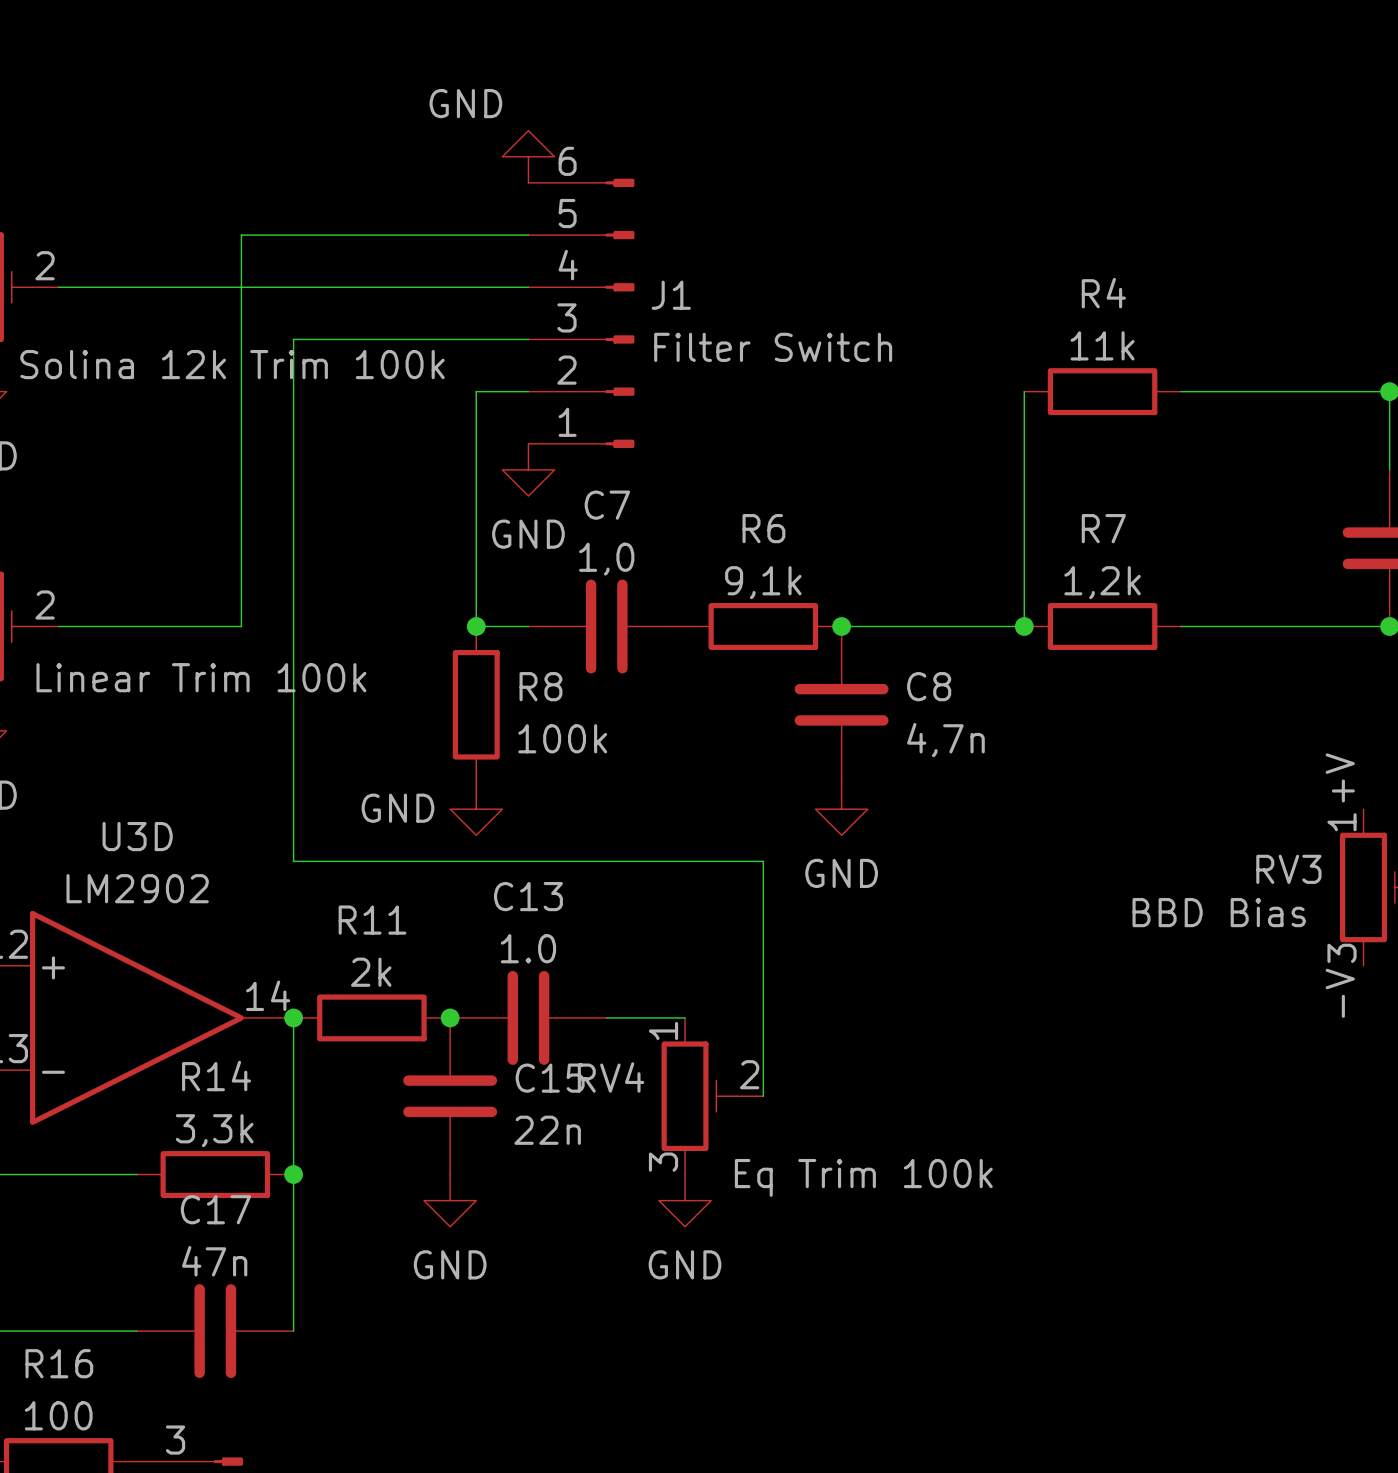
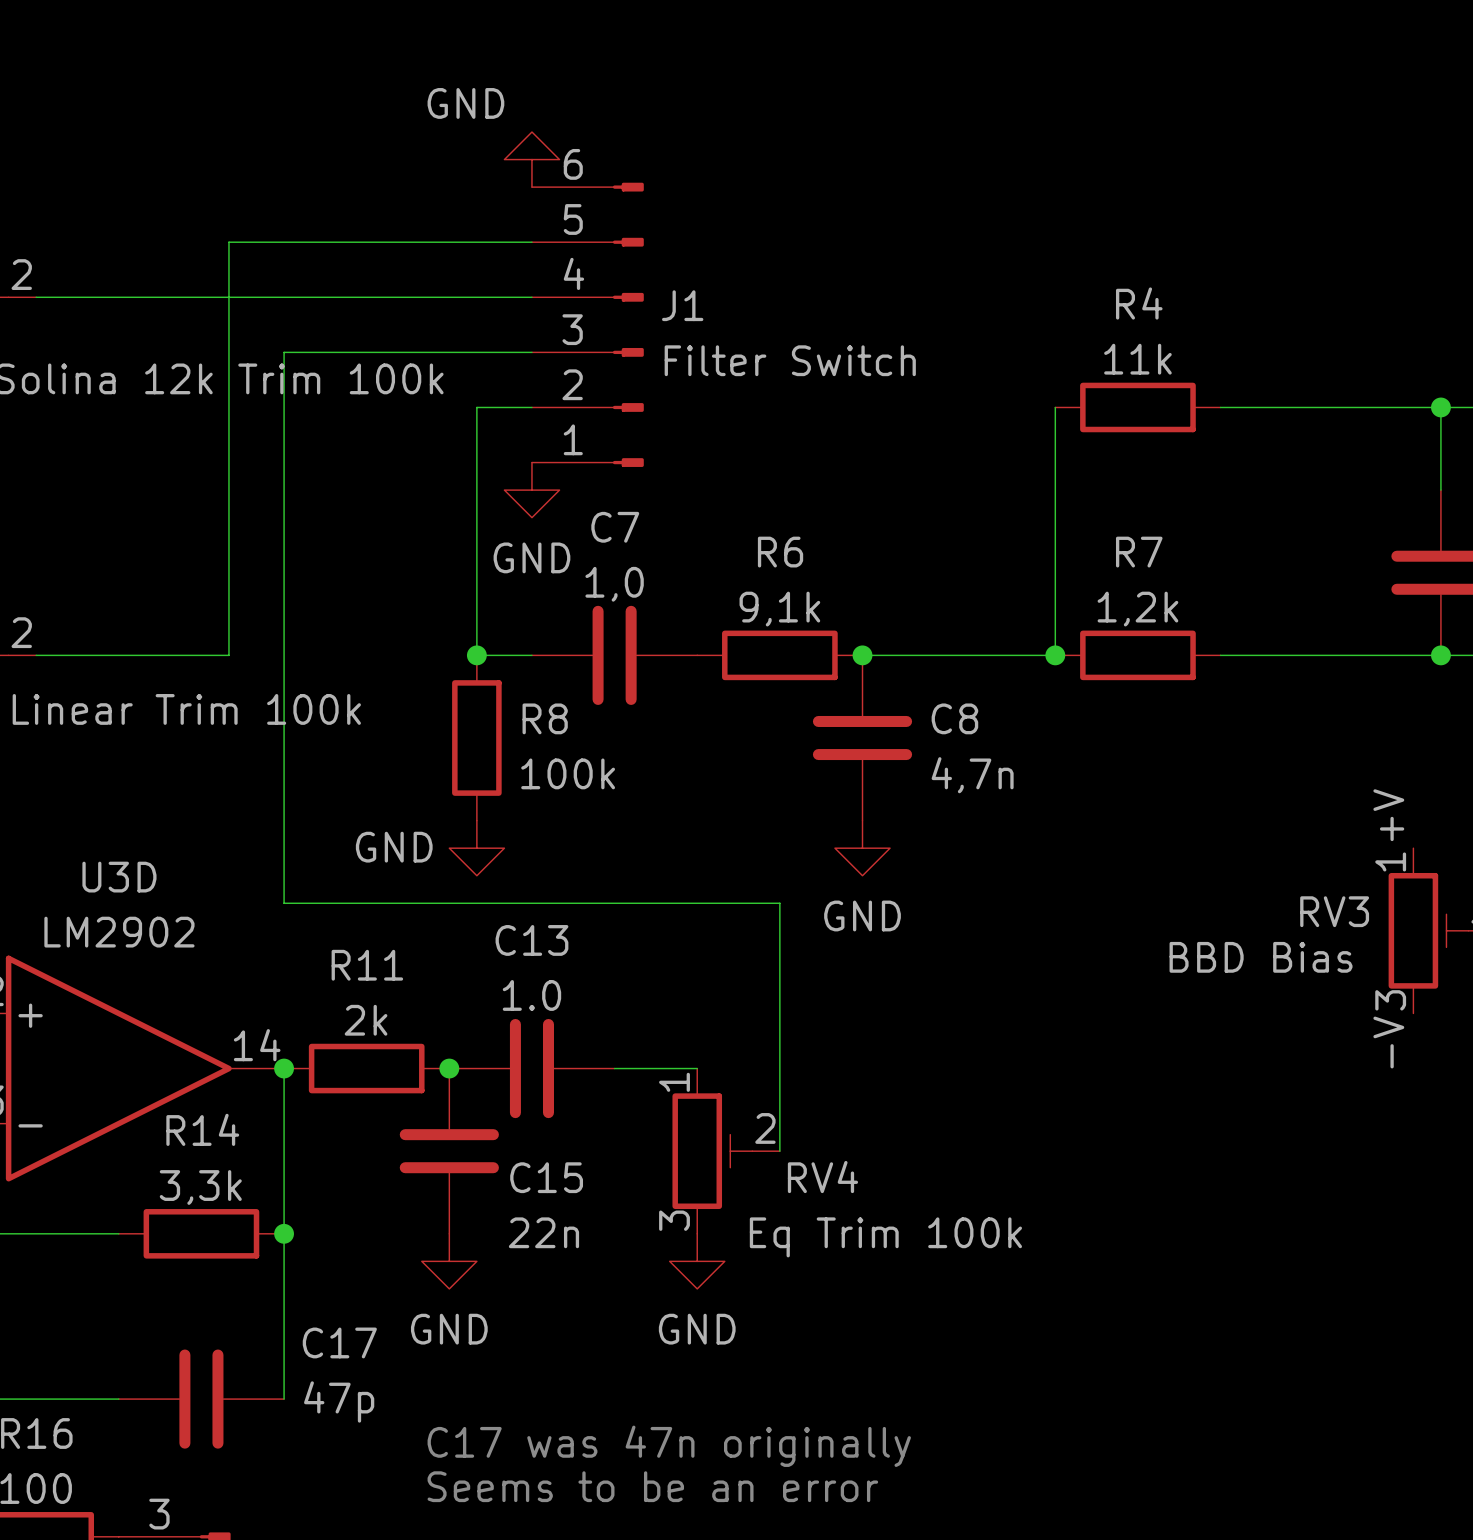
RV4 name position: RV4 (611, 1077) -> RV4 (822, 1177)
C15 name position: C15 (550, 1078) -> C15 (546, 1177)
C15 value position: 22n (547, 1130) -> 22n (543, 1232)
C17 name position: C17 (215, 1209) -> C17 (339, 1342)
C17 value: 47n (214, 1261) -> 47p (339, 1401)
text: none -> C17 was 47n originally (669, 1446)
text: none -> Seems to be an error (652, 1486)

